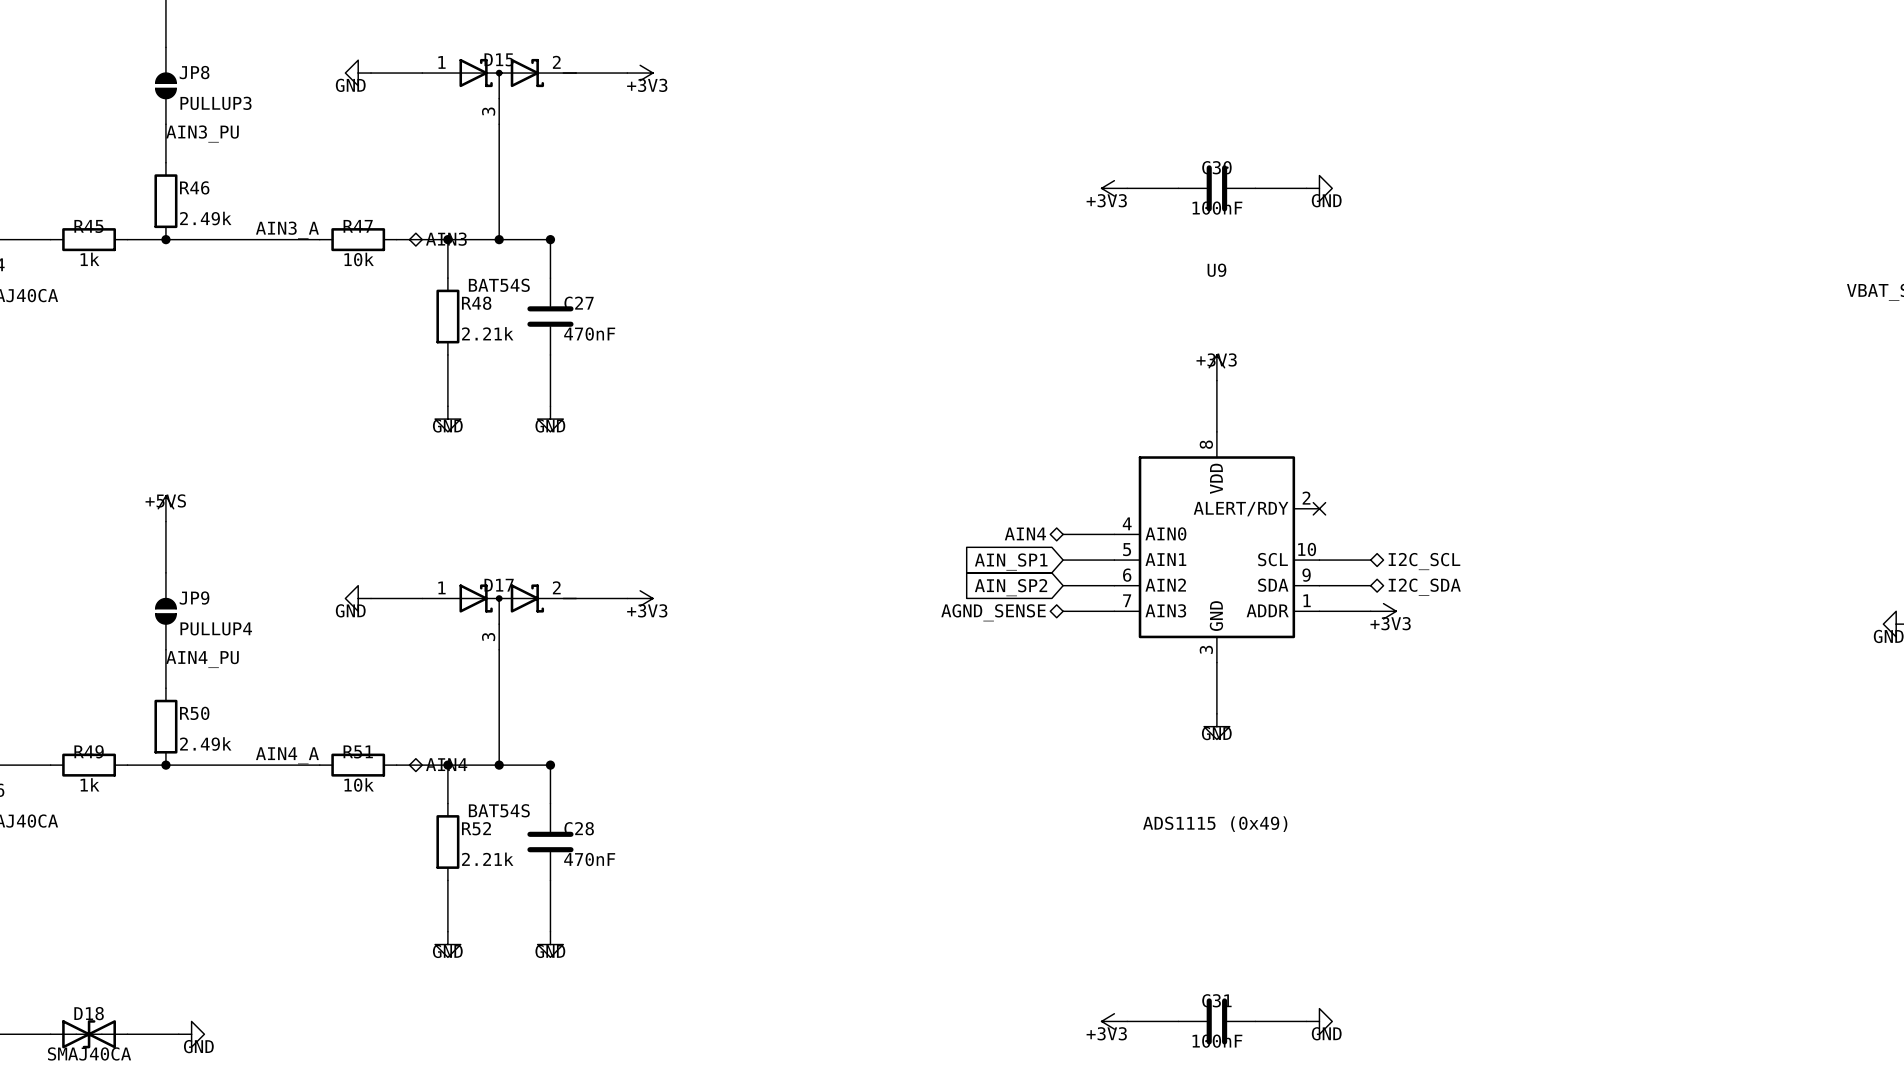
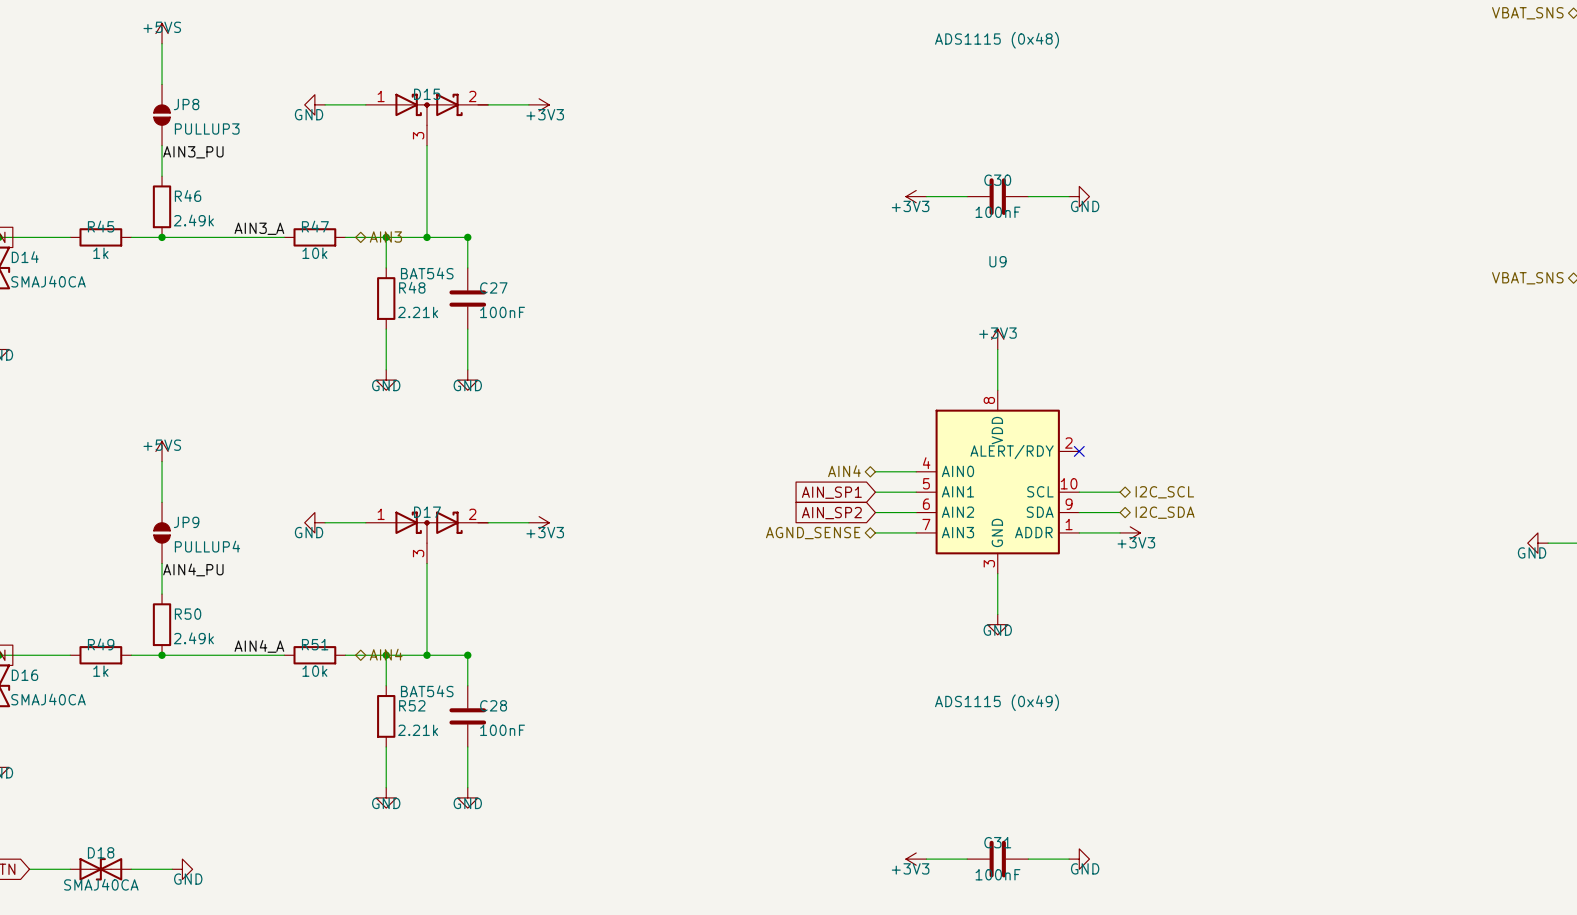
C27 value: 470nF (589, 334) -> 100nF (502, 312)
C28 value: 470nF (589, 859) -> 100nF (502, 730)

